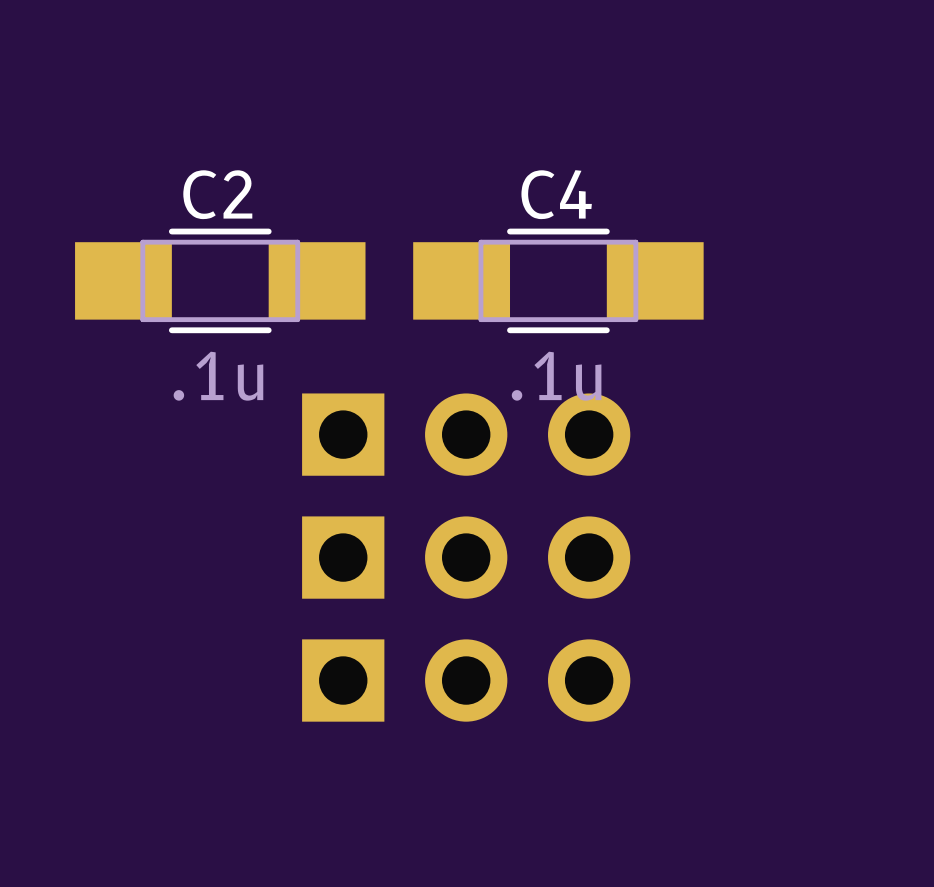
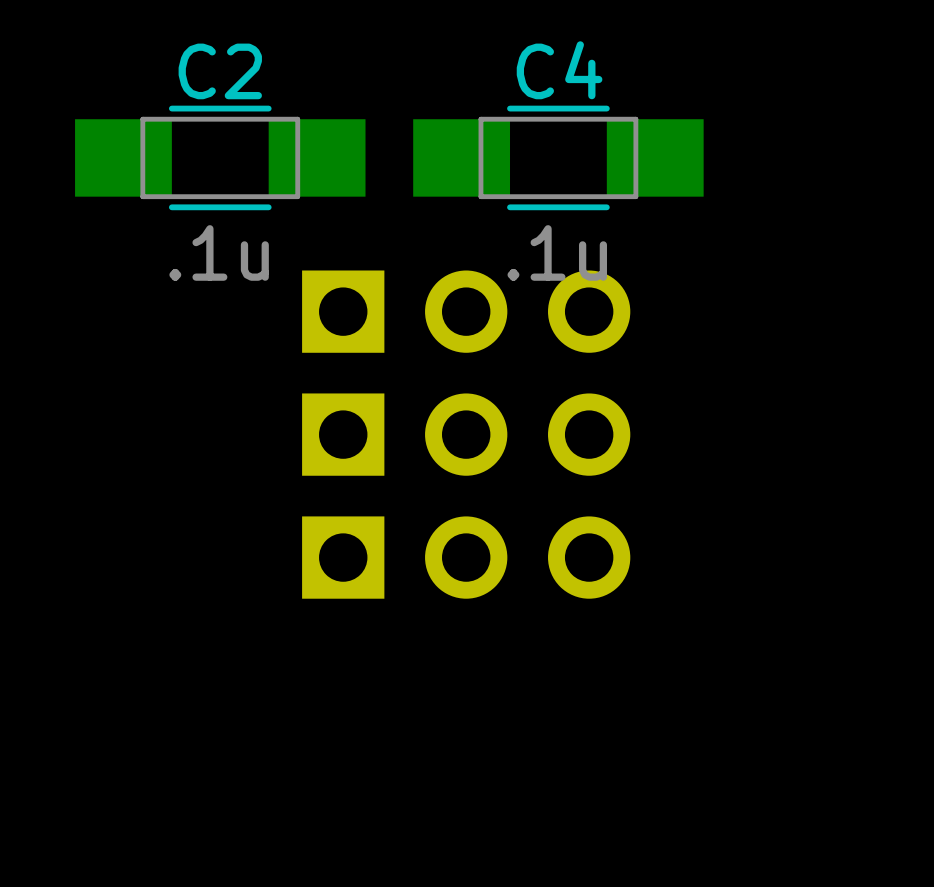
C2 position: (220, 280) -> (220, 157)
C4 position: (558, 280) -> (558, 157)
part position: (466, 680) -> (466, 311)

